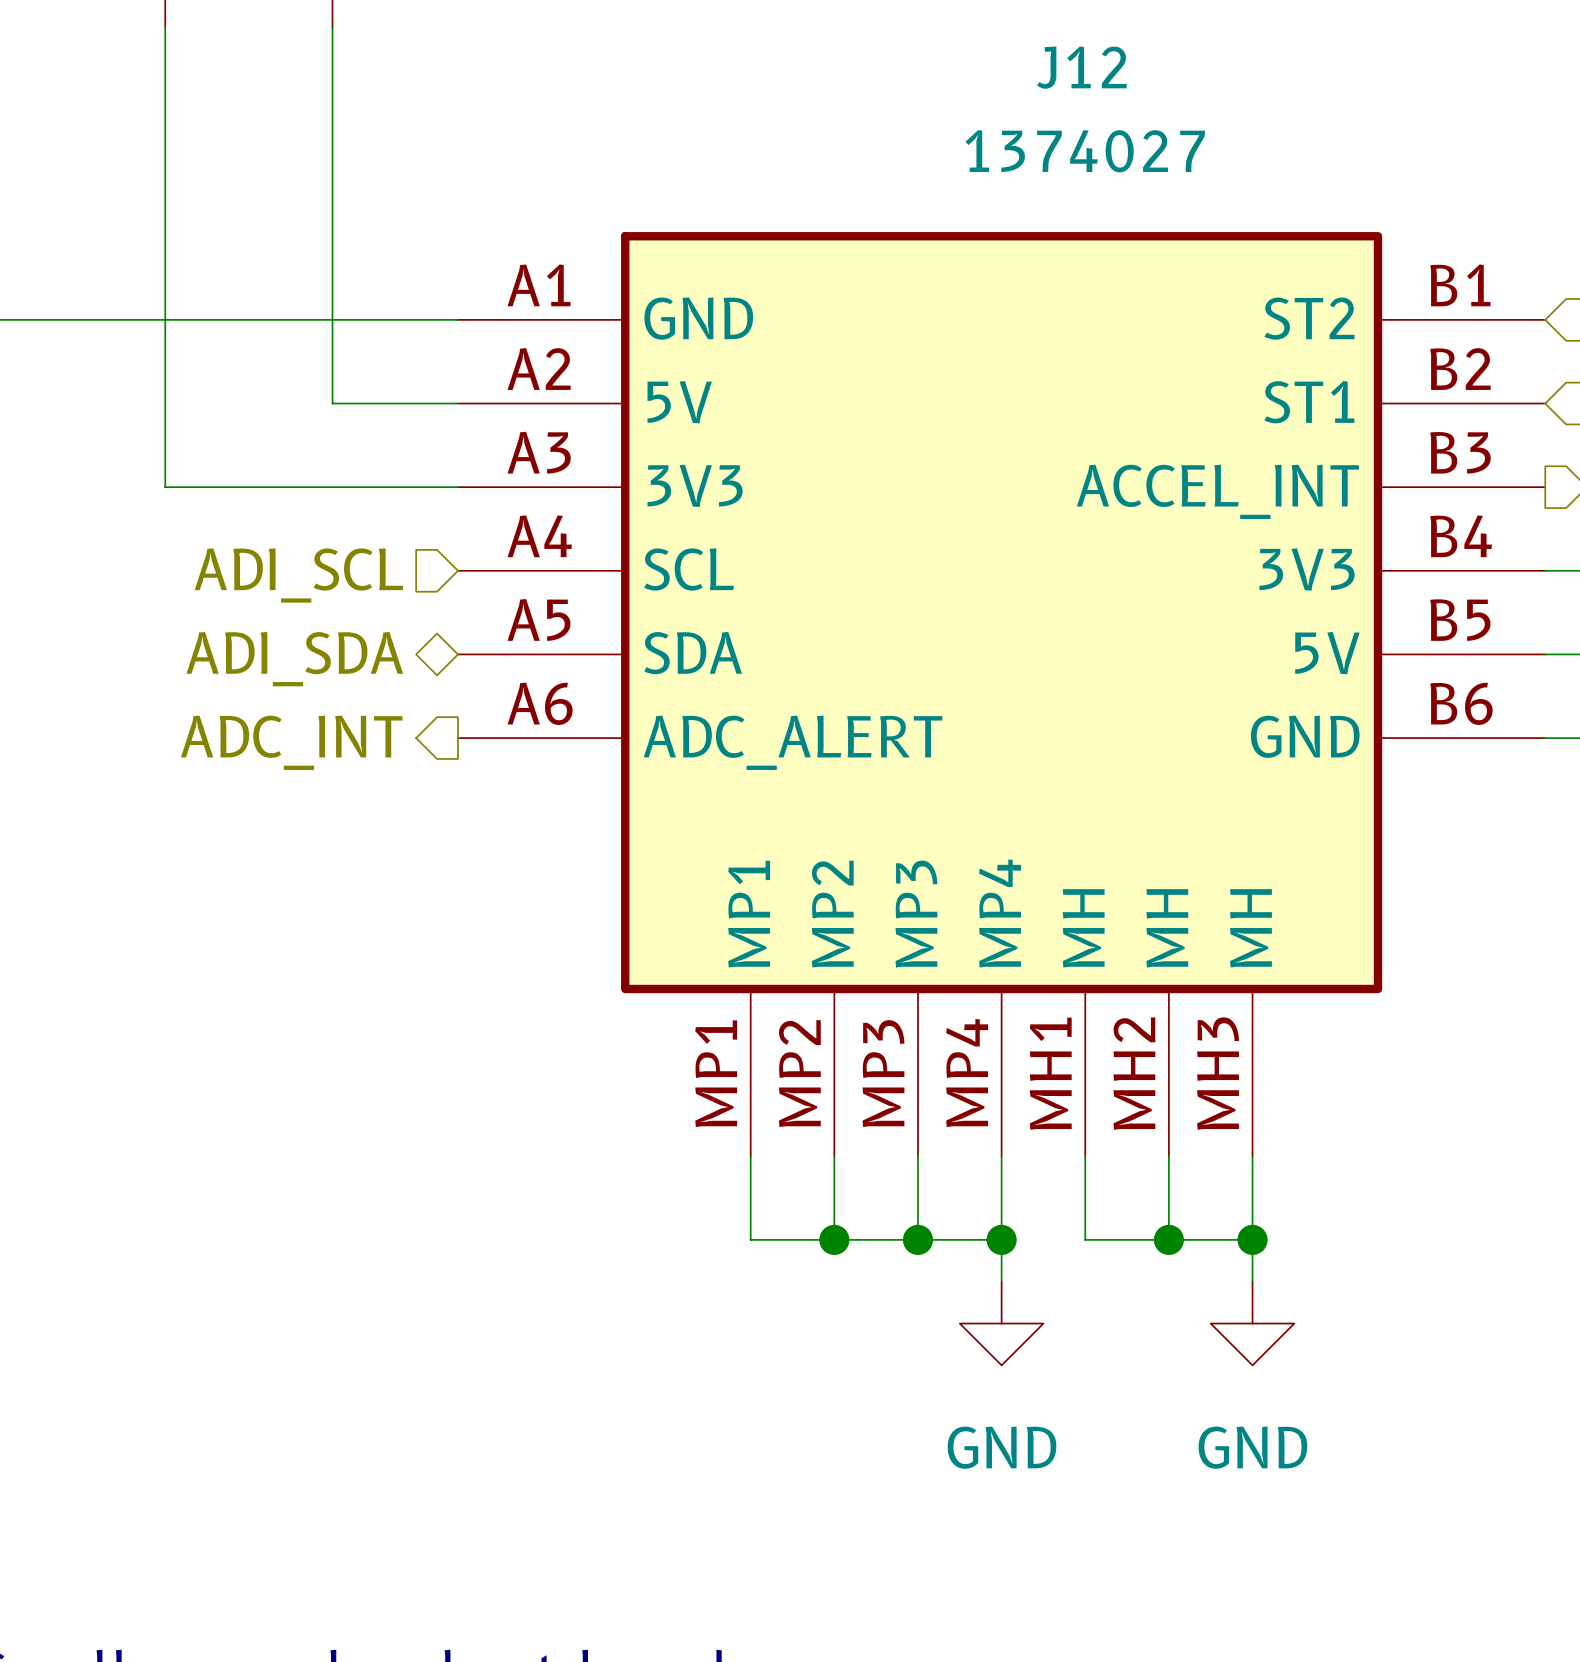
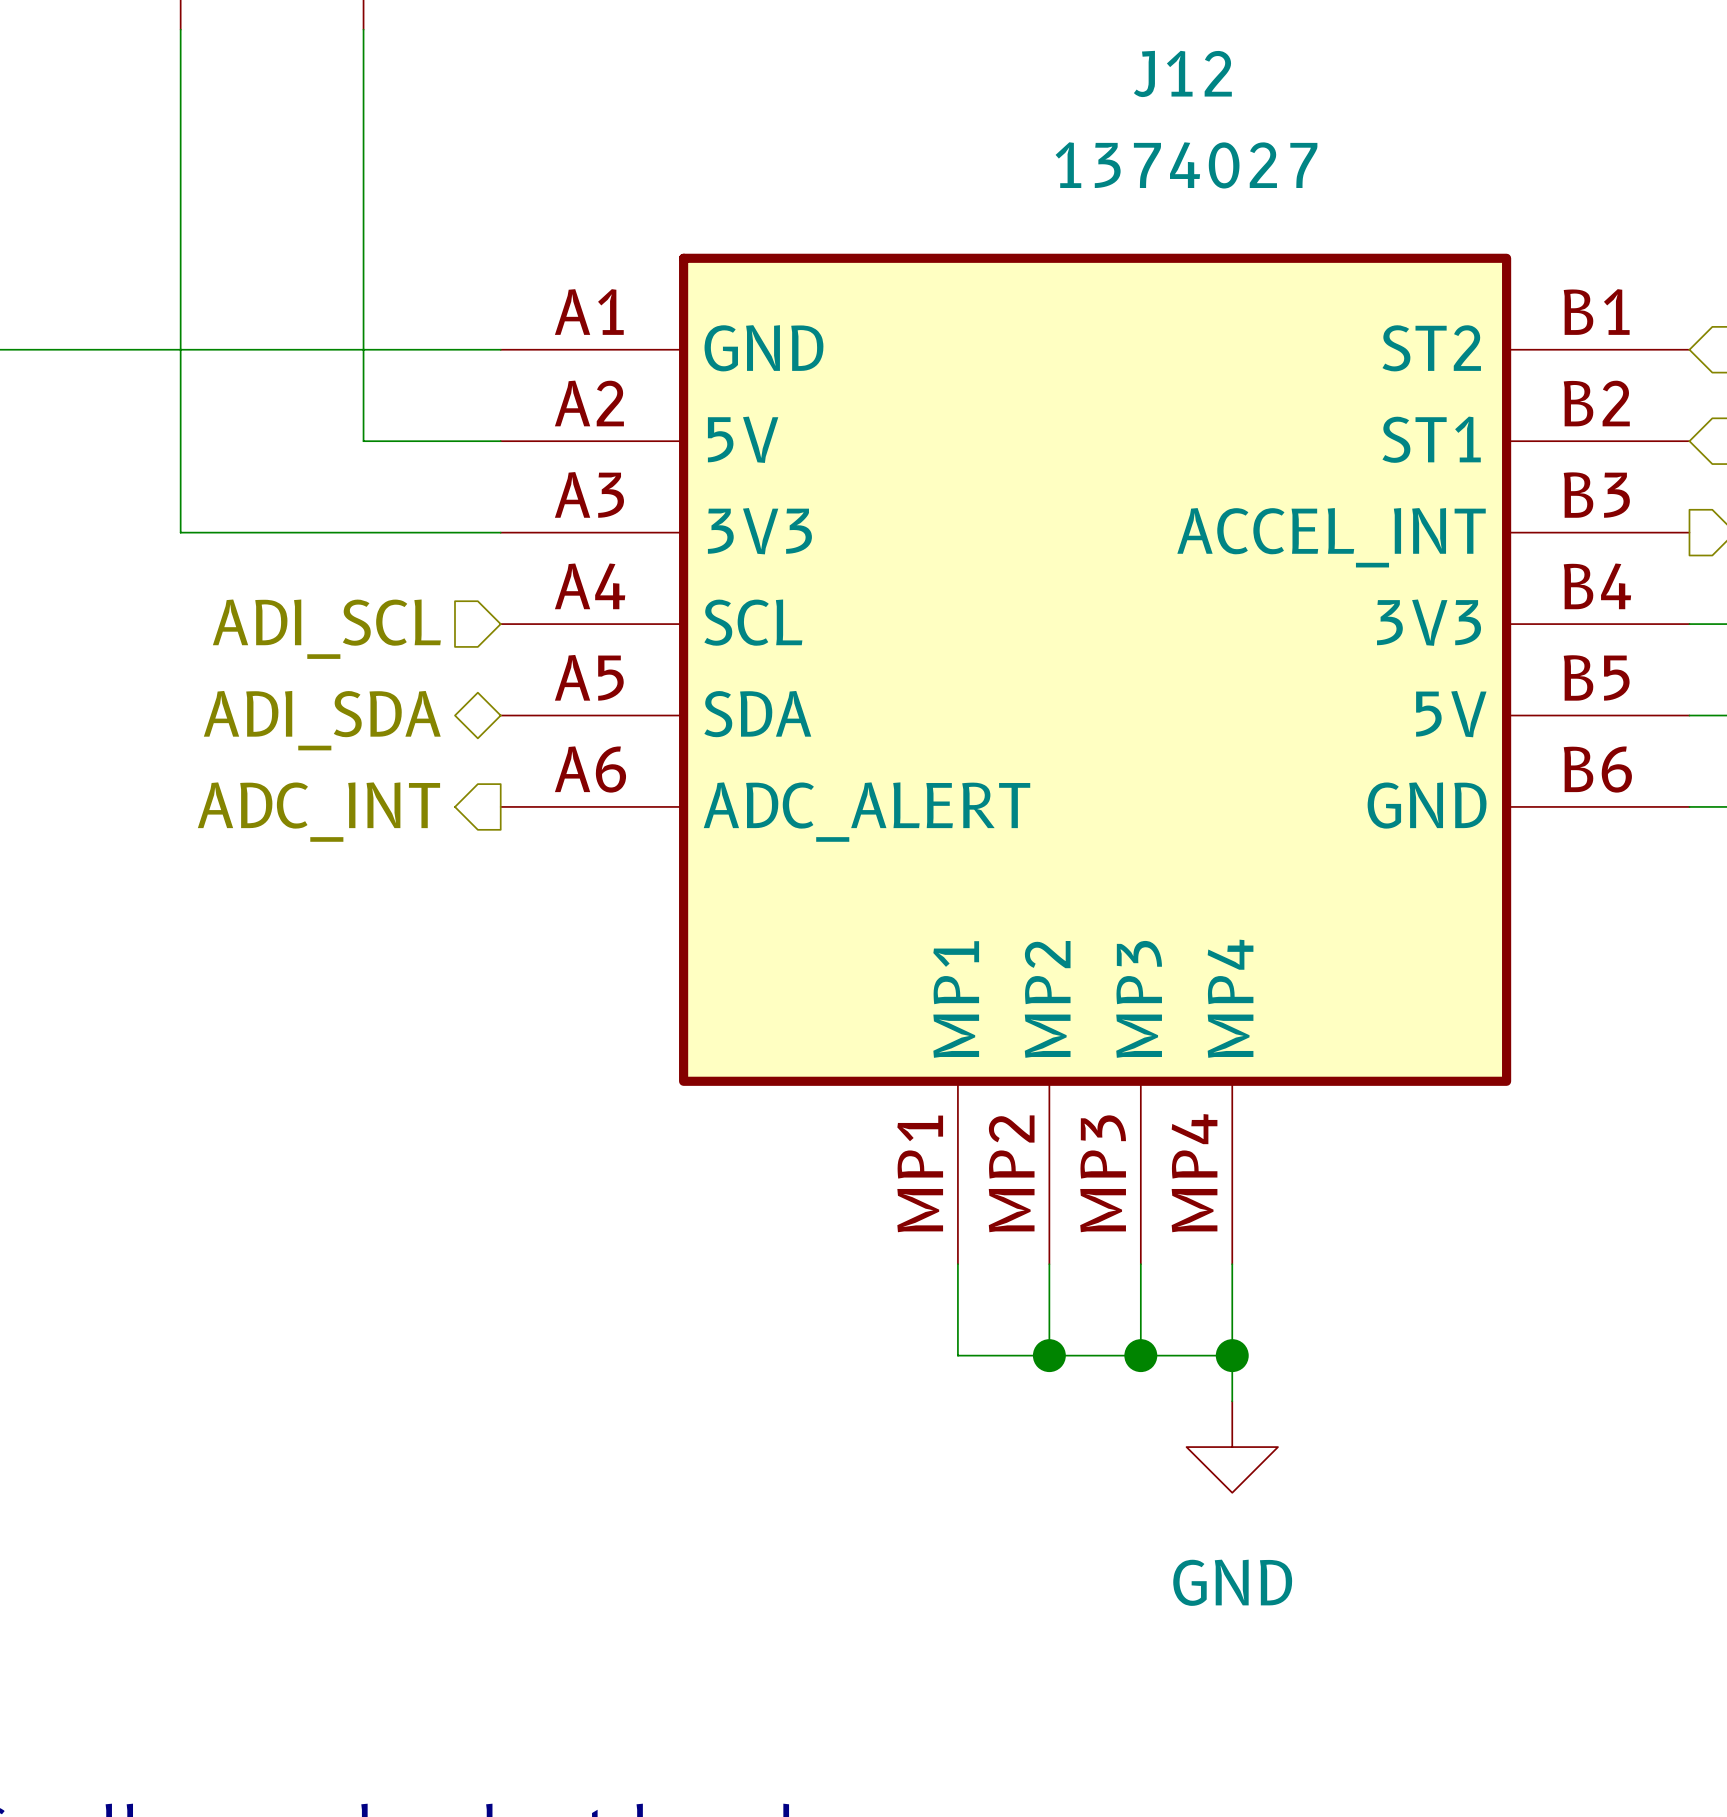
J12 symbol: [457, 232, 1546, 1157] -> [500, 253, 1690, 1265]
wire: (750, 1156) (750, 1239) (876, 1239) -> (957, 1264) (957, 1355)
wire: (834, 1156) (834, 1239) -> (1049, 1264) (1049, 1355)
wire: (917, 1156) (917, 1239) -> (1140, 1264) (1140, 1355)
wire: (1001, 1156) (1001, 1281) -> (1232, 1264) (1232, 1401)
wire: (1085, 1156) (1085, 1239) -> (1095, 1355) (1186, 1355)
wire: (1168, 1156) (1168, 1239) -> none
wire: (1252, 1156) (1252, 1281) -> none
junction: (834, 1239) -> none
junction: (917, 1239) -> none
junction: none -> (1049, 1355)
junction: (1001, 1239) -> none
junction: none -> (1140, 1355)
wire: (1127, 1239) (1252, 1239) -> none
junction position: (1168, 1239) -> (1232, 1355)
junction: (1252, 1239) -> none
power symbol: GND (1001, 1323) -> none
power symbol: none -> GND (1232, 1447)
power symbol: GND (1252, 1323) -> none

